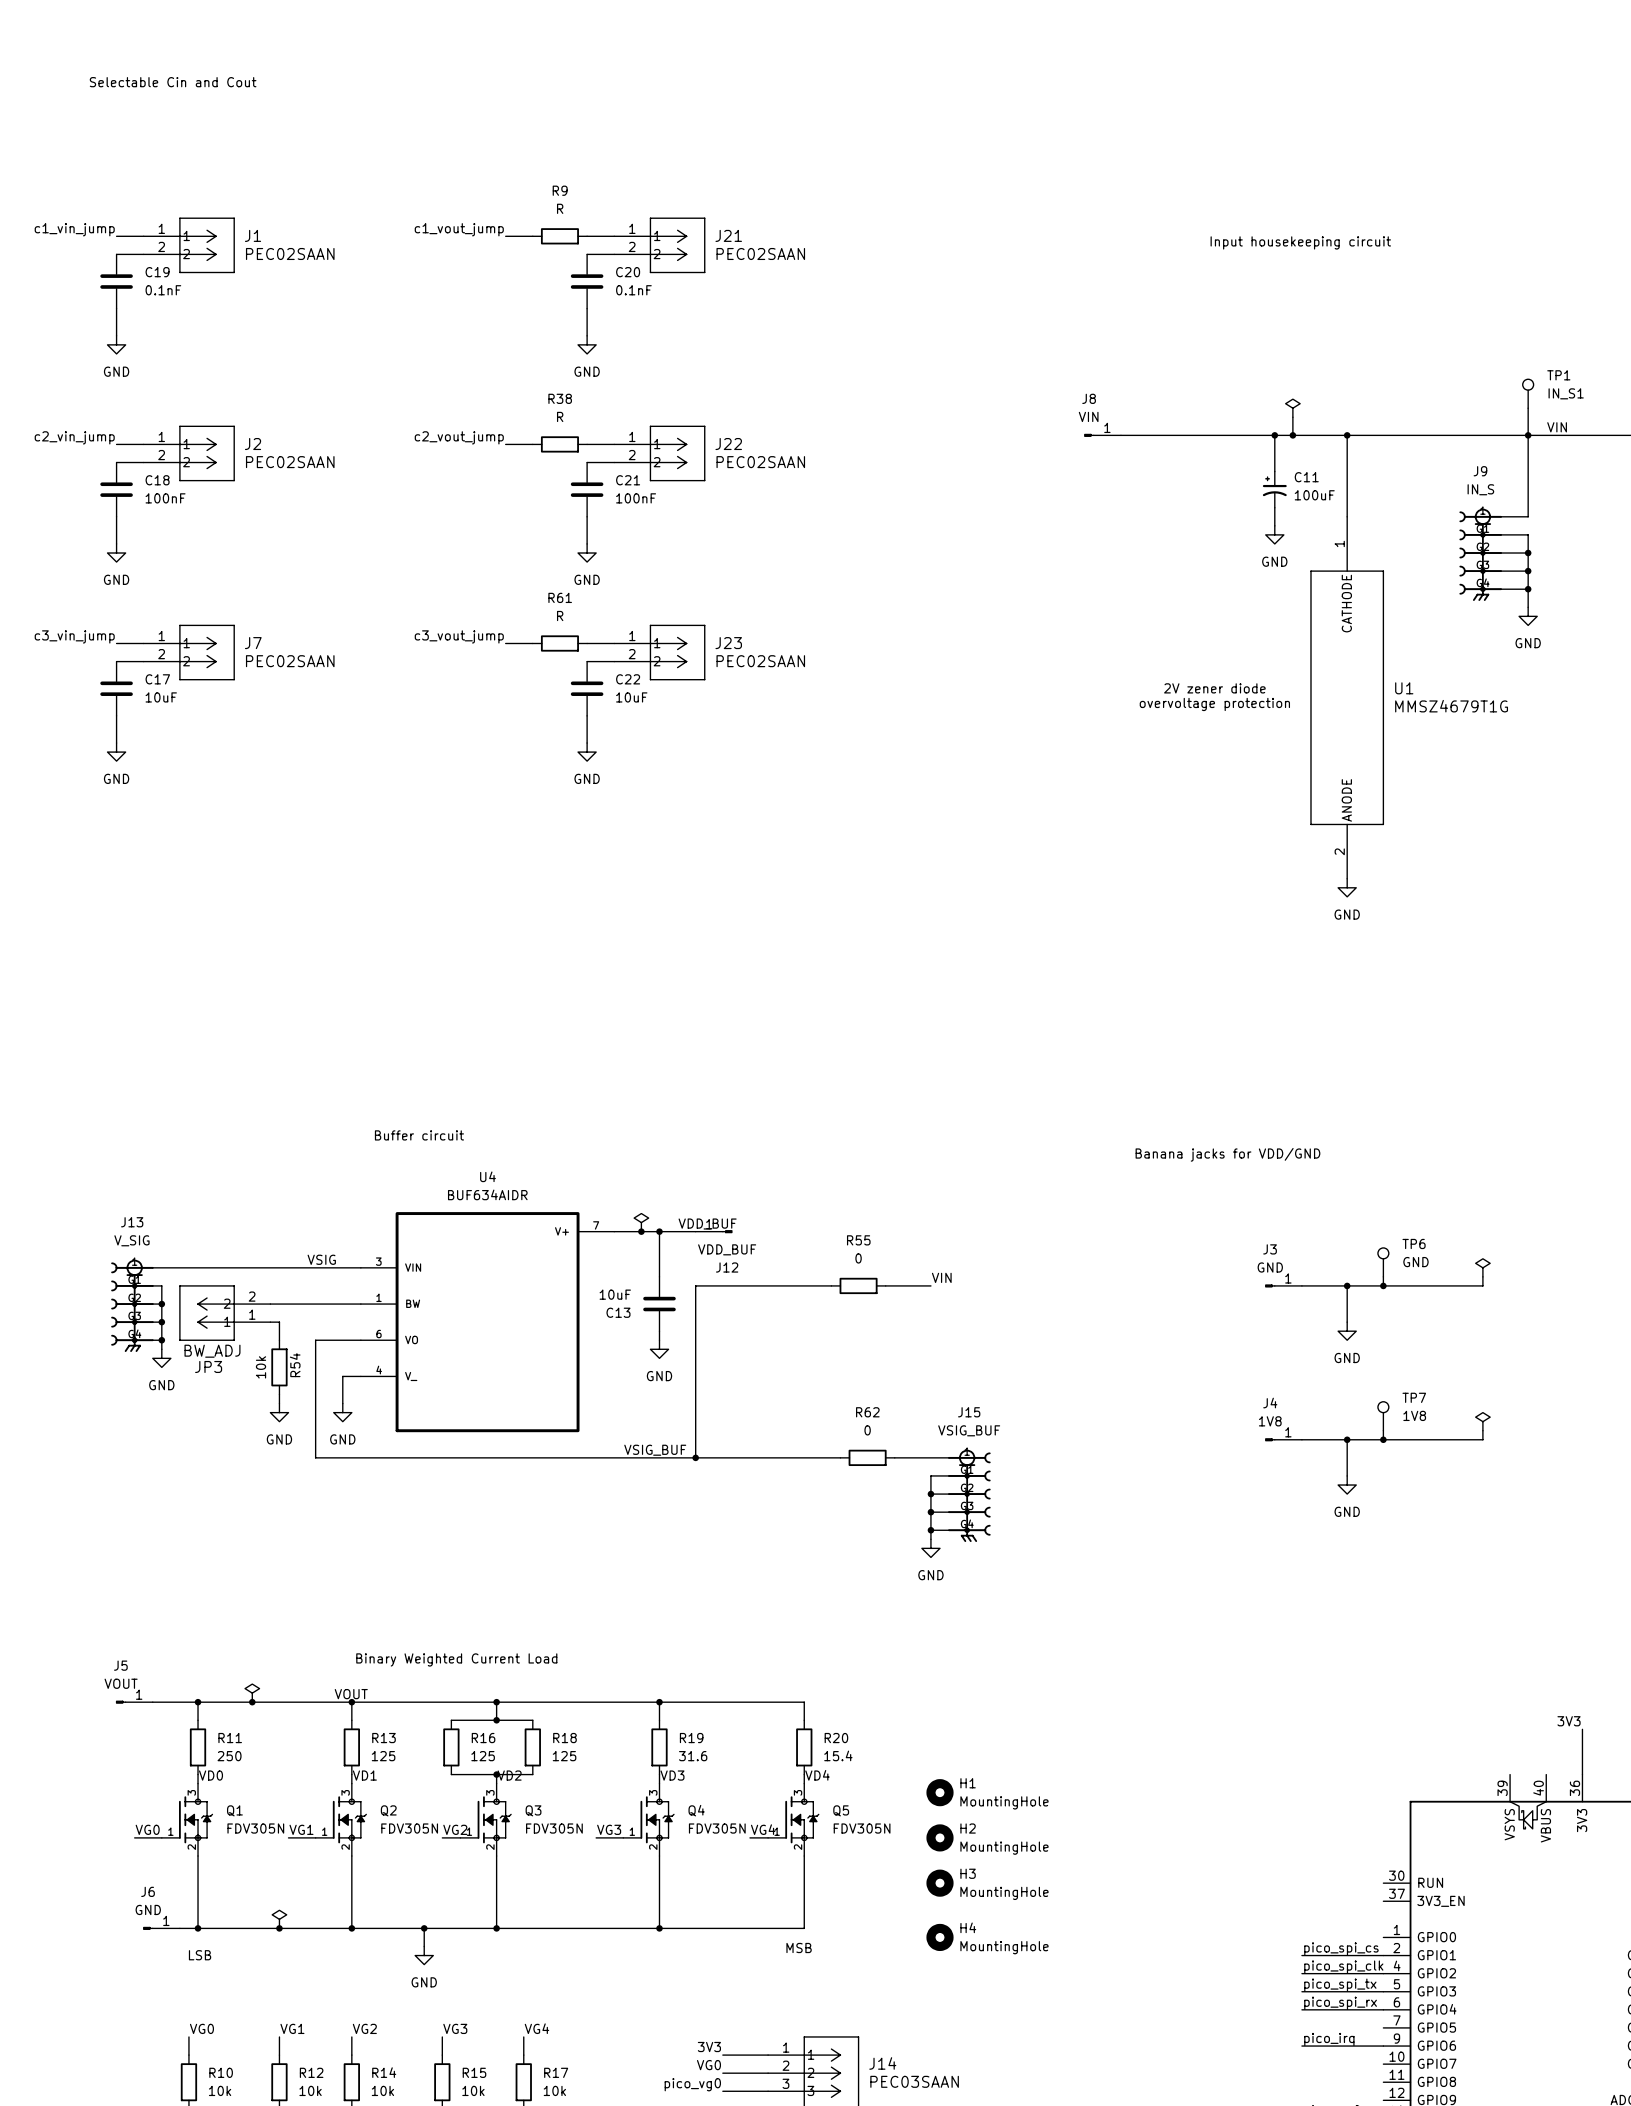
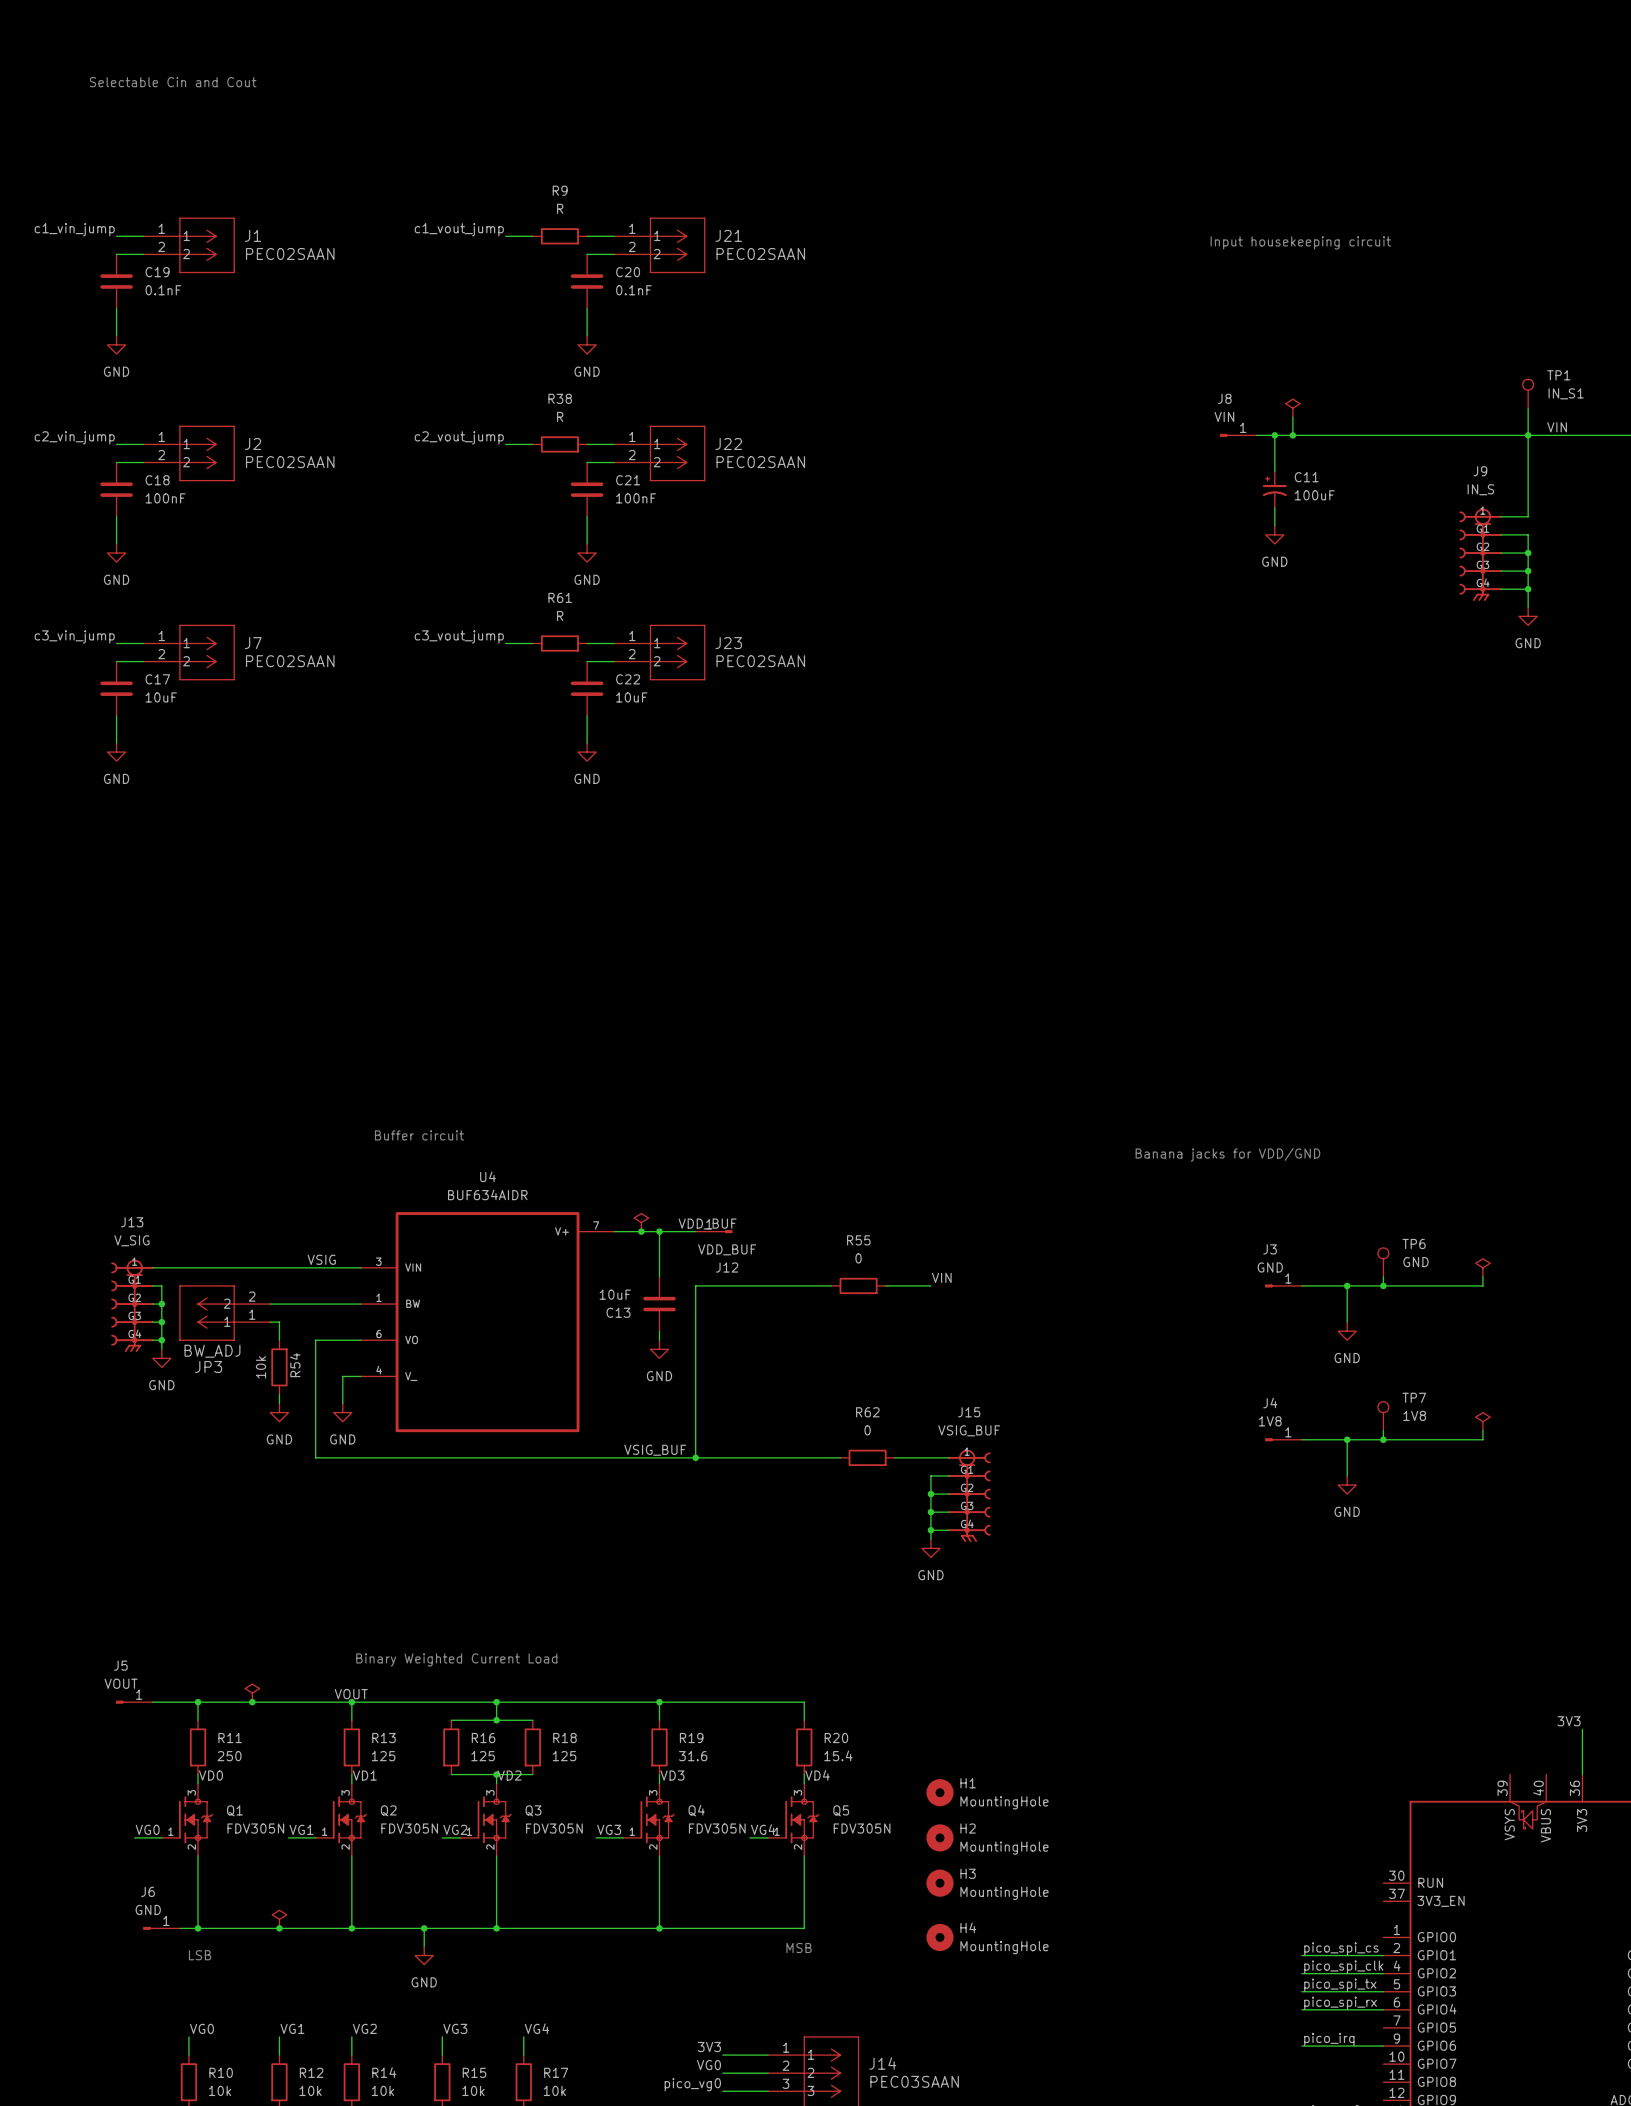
J8 position: (1102, 435) -> (1238, 435)
wire: (1120, 435) (1256, 435) -> none
wire: (1347, 435) (1347, 516) -> none
junction: (1347, 435) -> none
text: 2V zener diode (1214, 688) -> none
U1: MMSZ4679T1G (1347, 697) -> none
text: overvoltage protection (1214, 704) -> none
power symbol: GND (1347, 887) -> none

